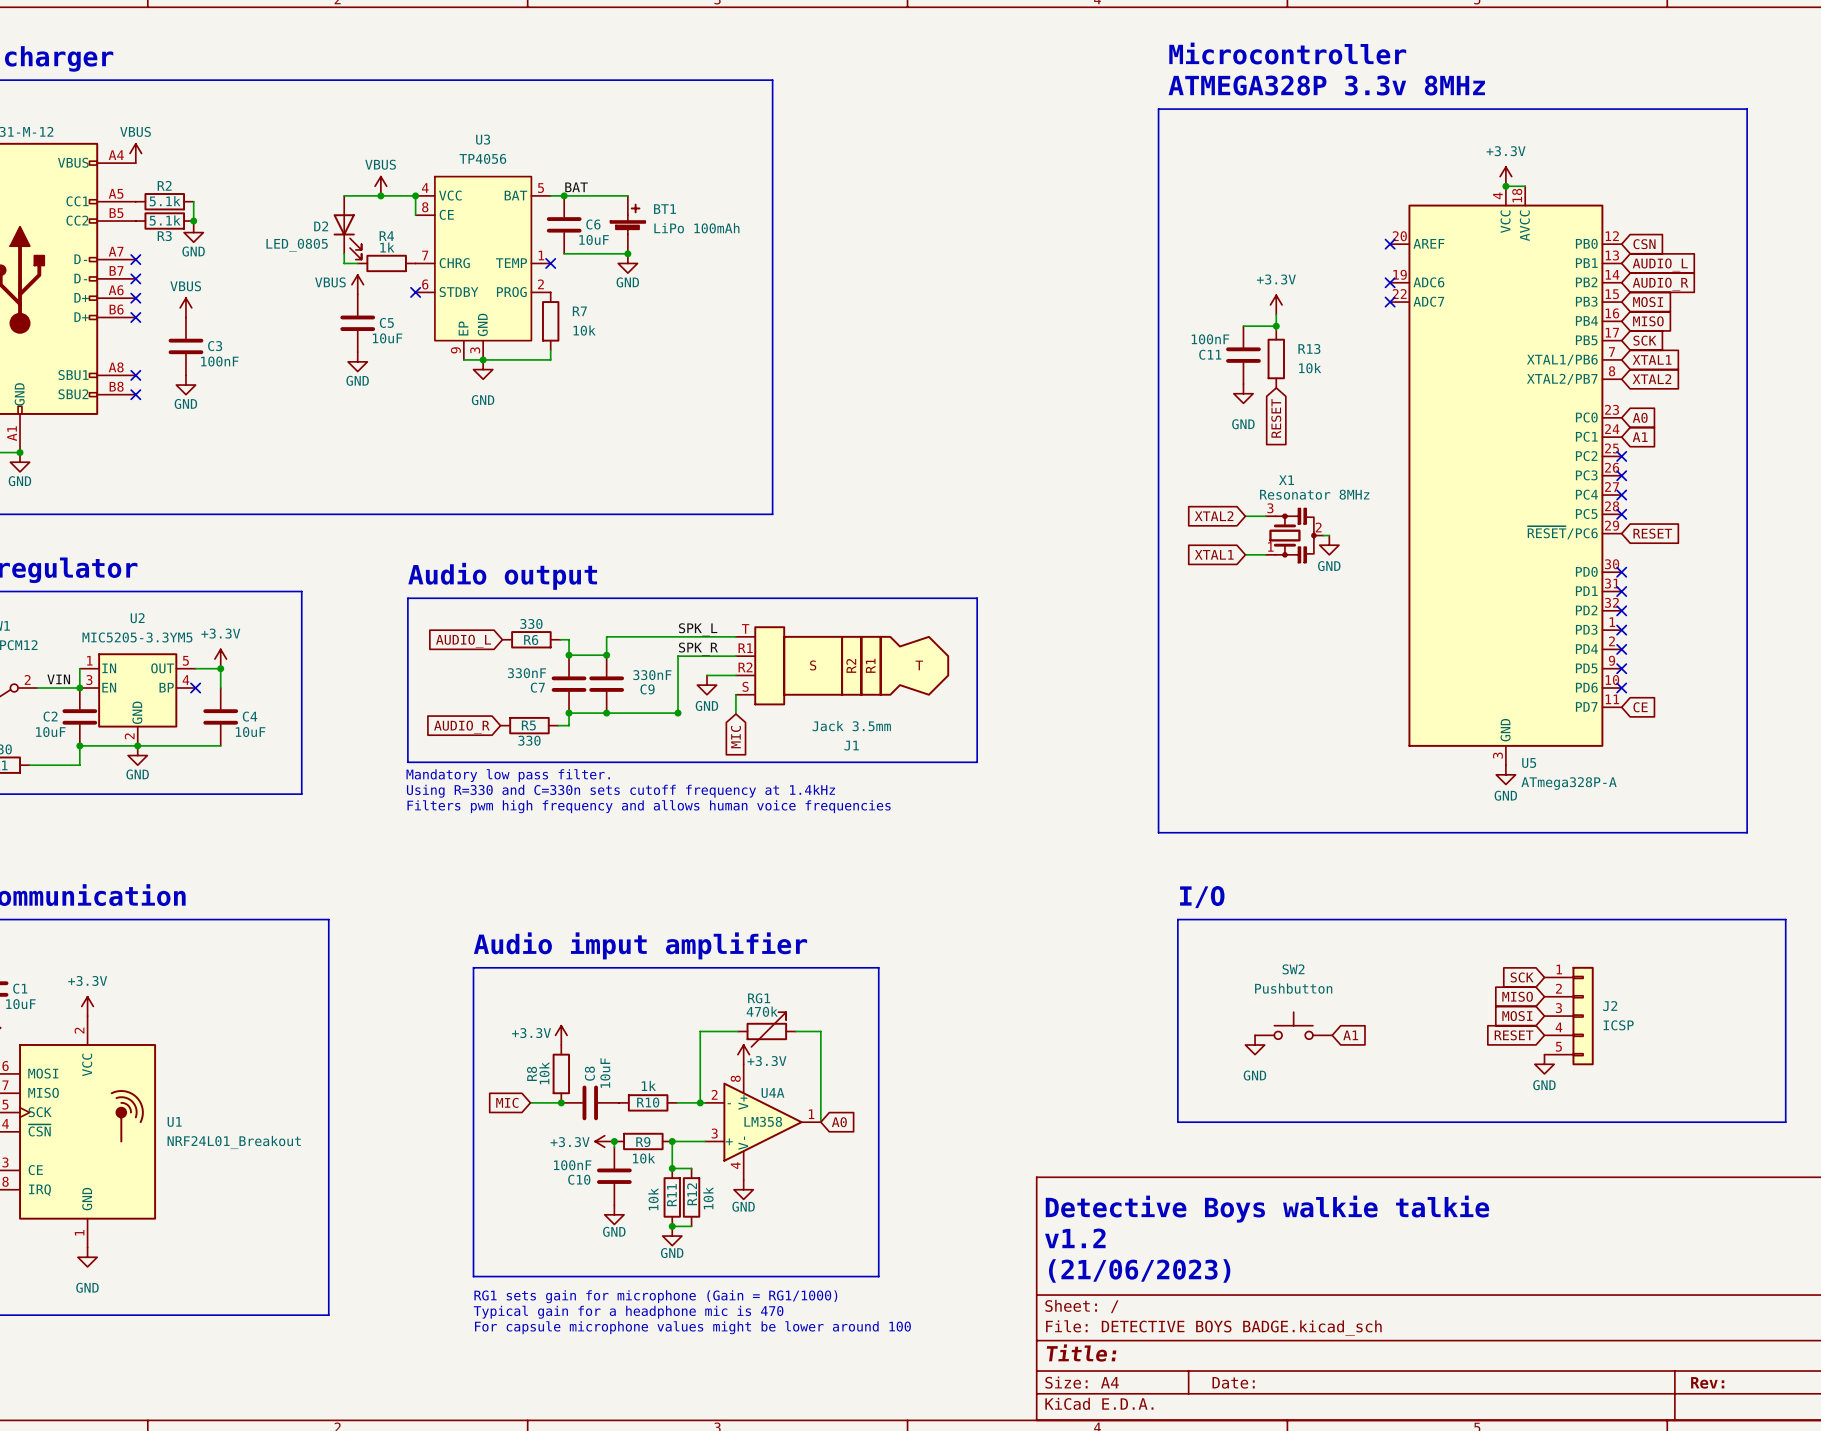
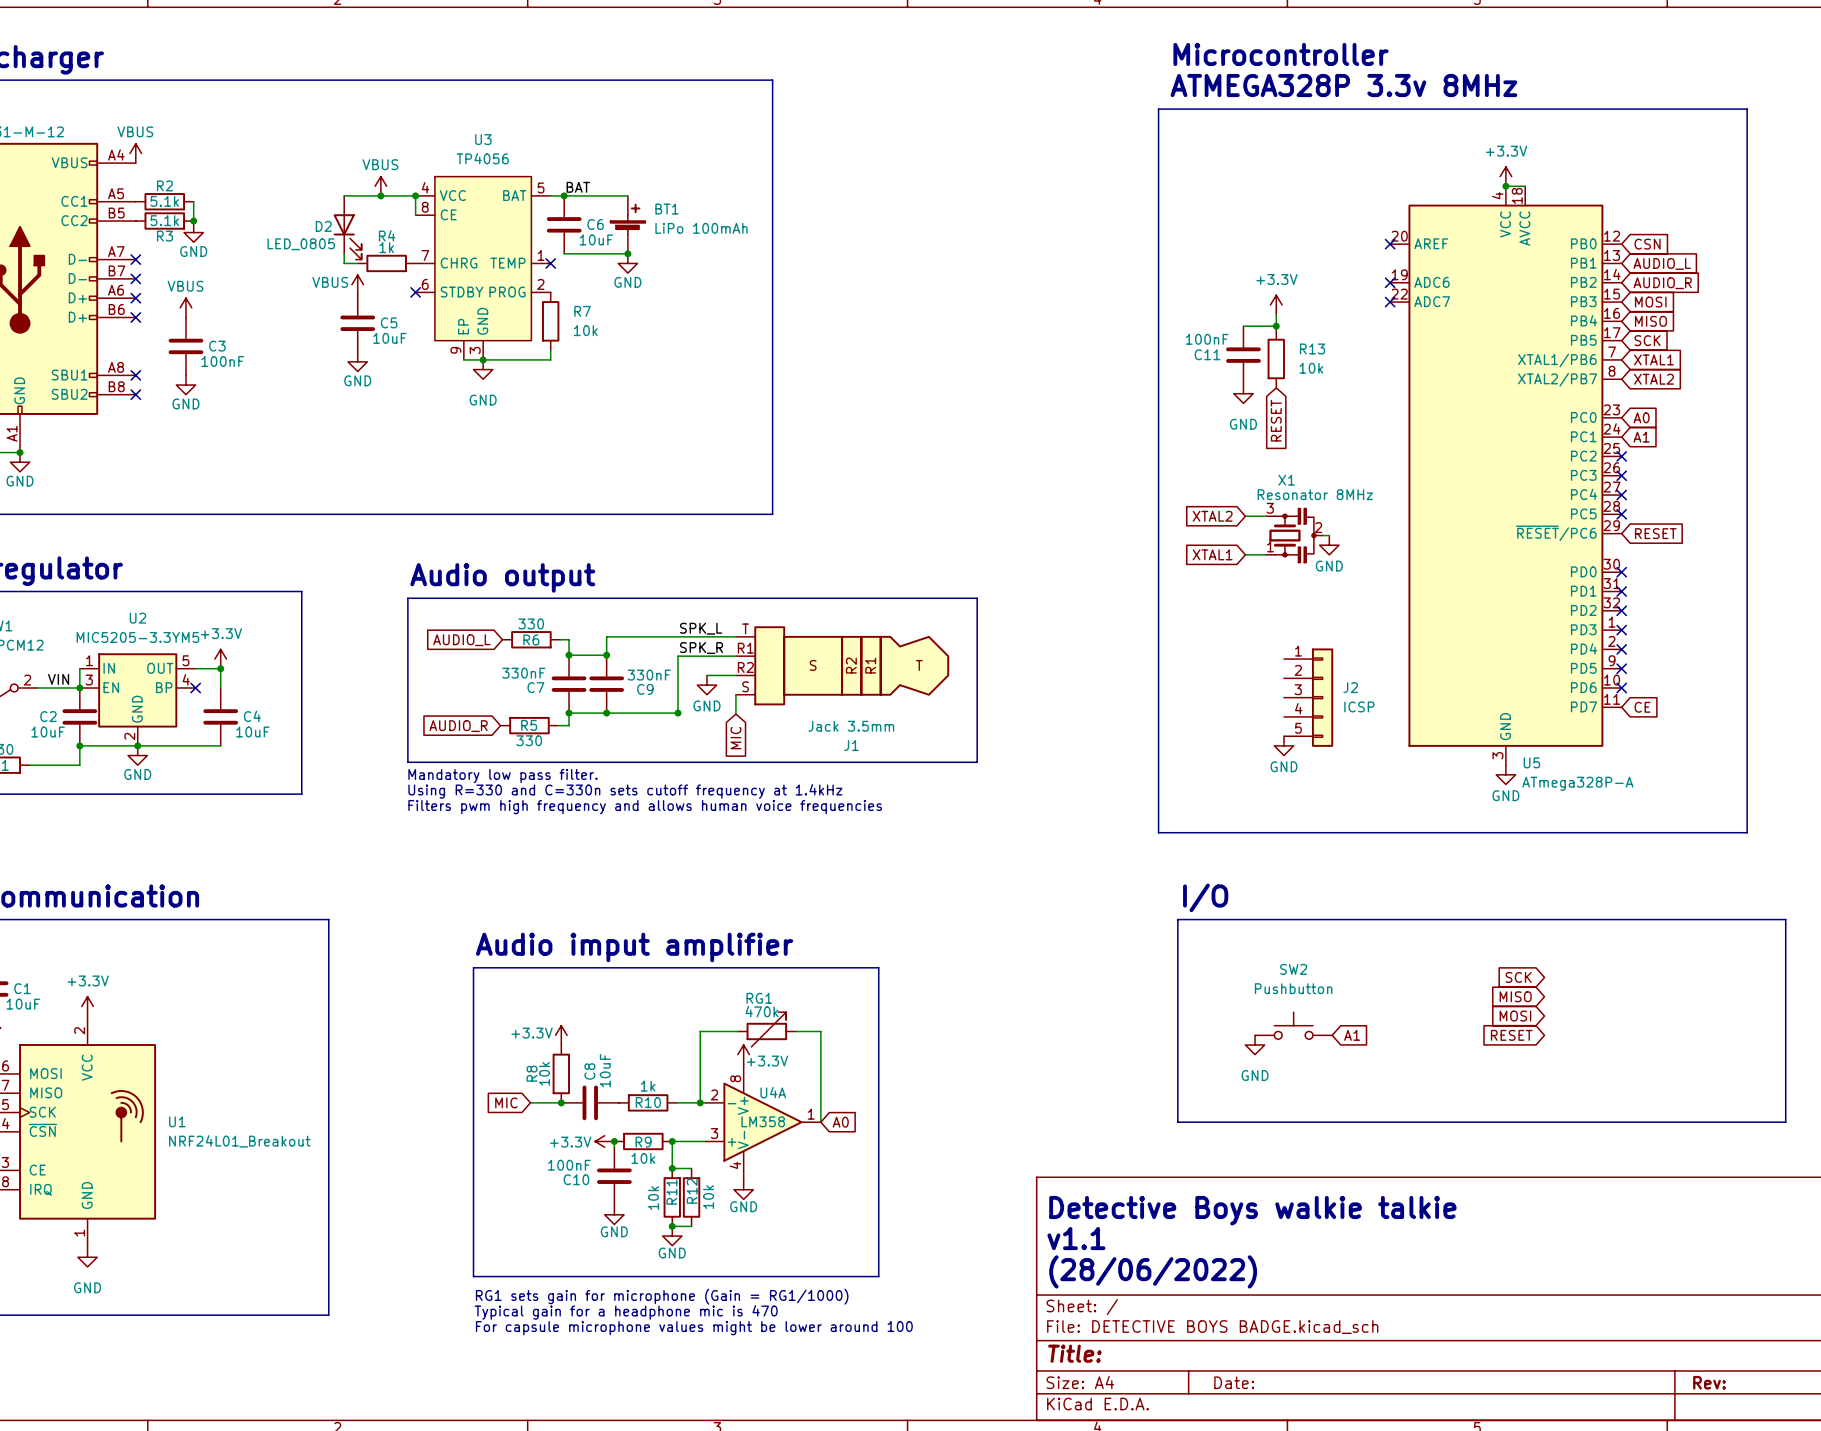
power symbol: none -> GND (1283, 745)
J2 position: (1569, 1016) -> (1308, 697)
power symbol: GND (1544, 1064) -> none
text: v1.2 (1075, 1238) -> v1.1 (1076, 1238)
text: (21/06/2023) (1139, 1270) -> (28/06/2022) (1153, 1271)

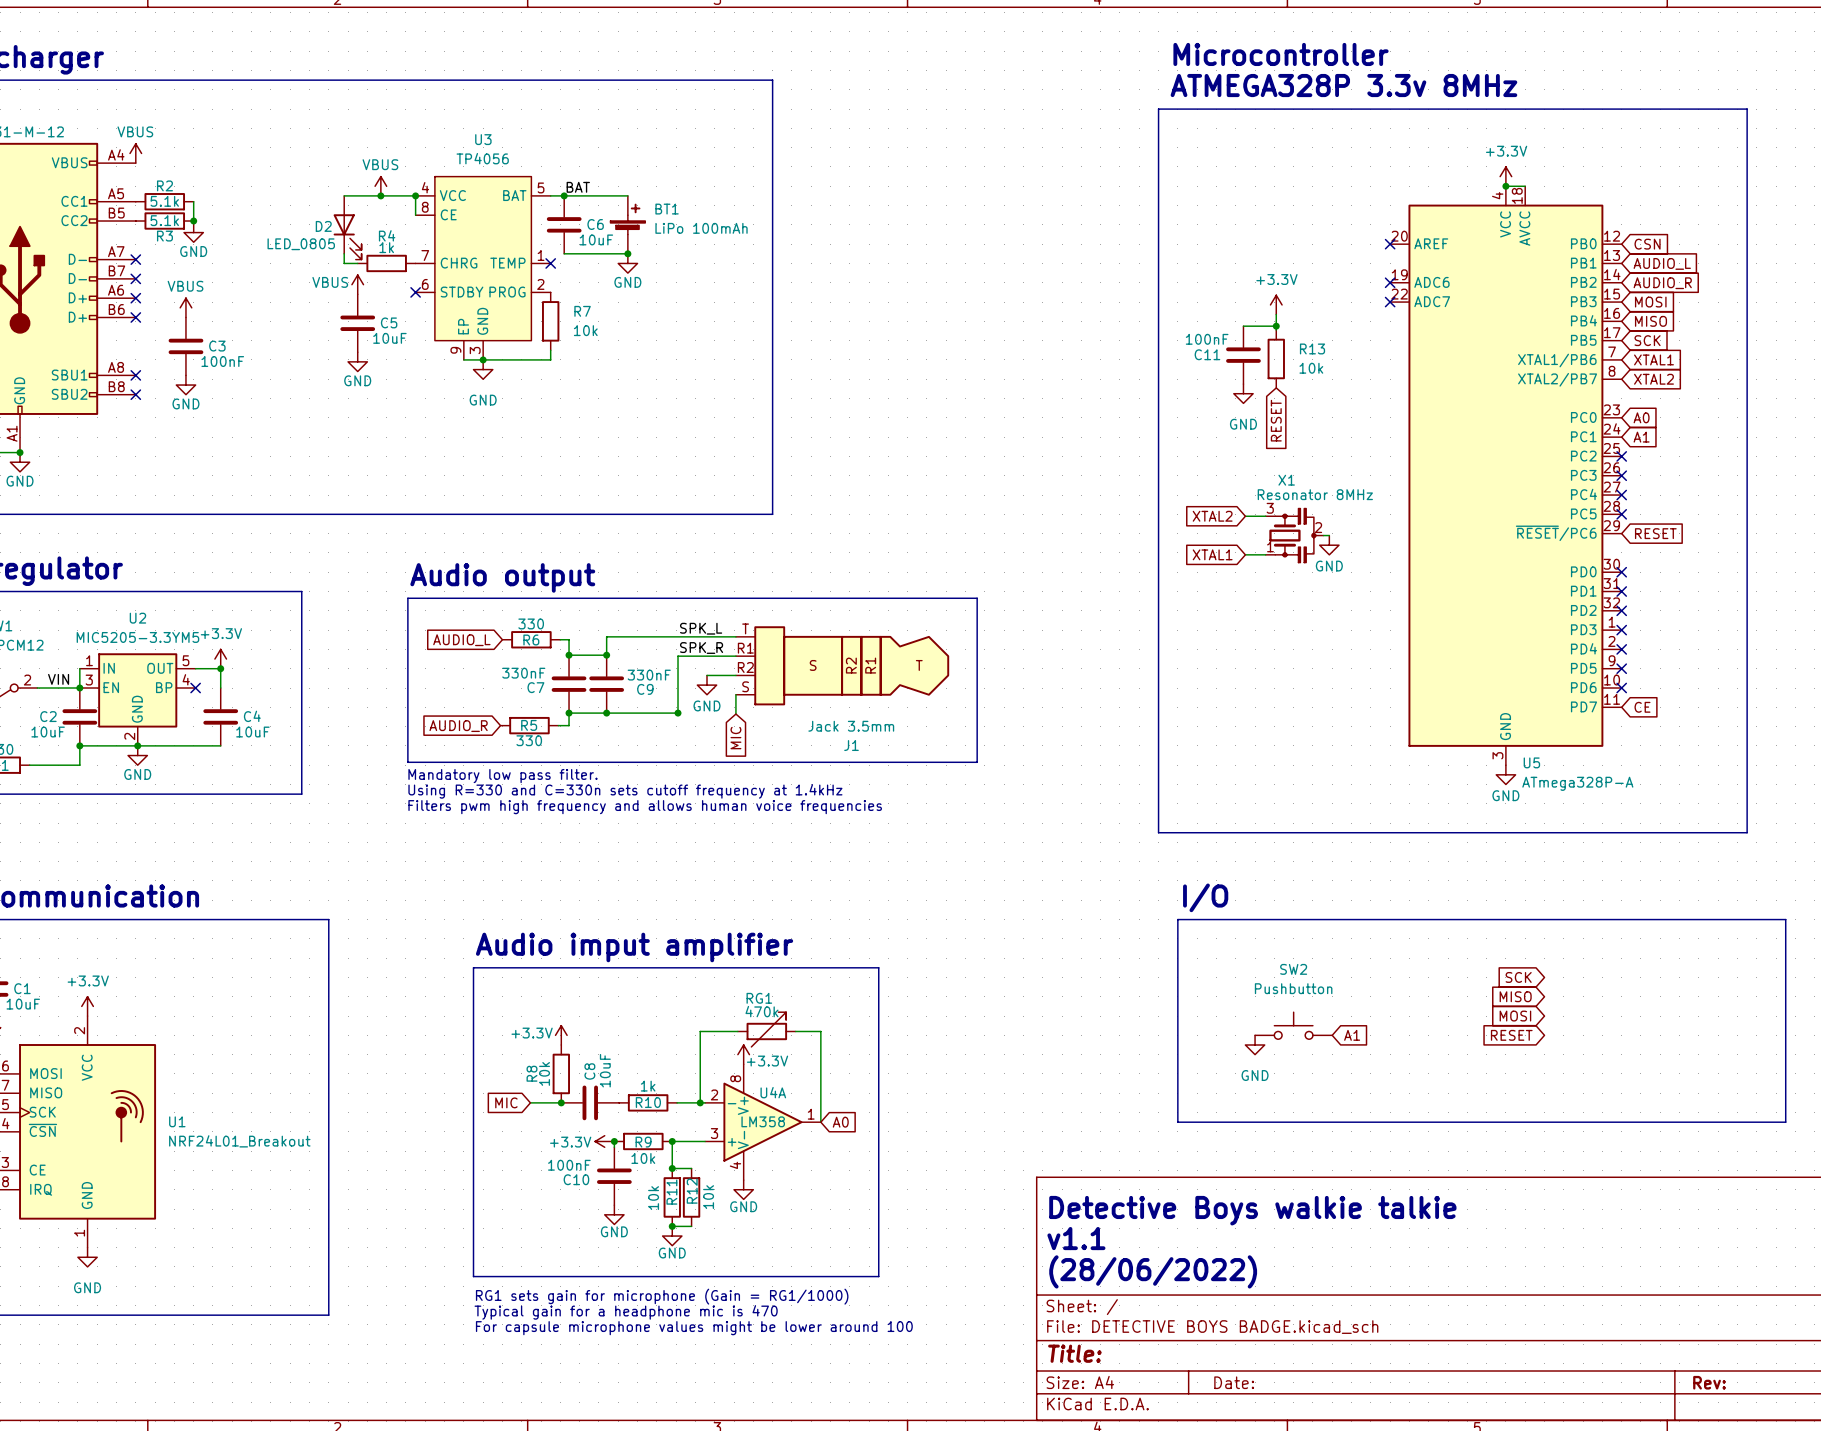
J2: ICSP (1308, 697) -> none
power symbol: GND (1283, 745) -> none

